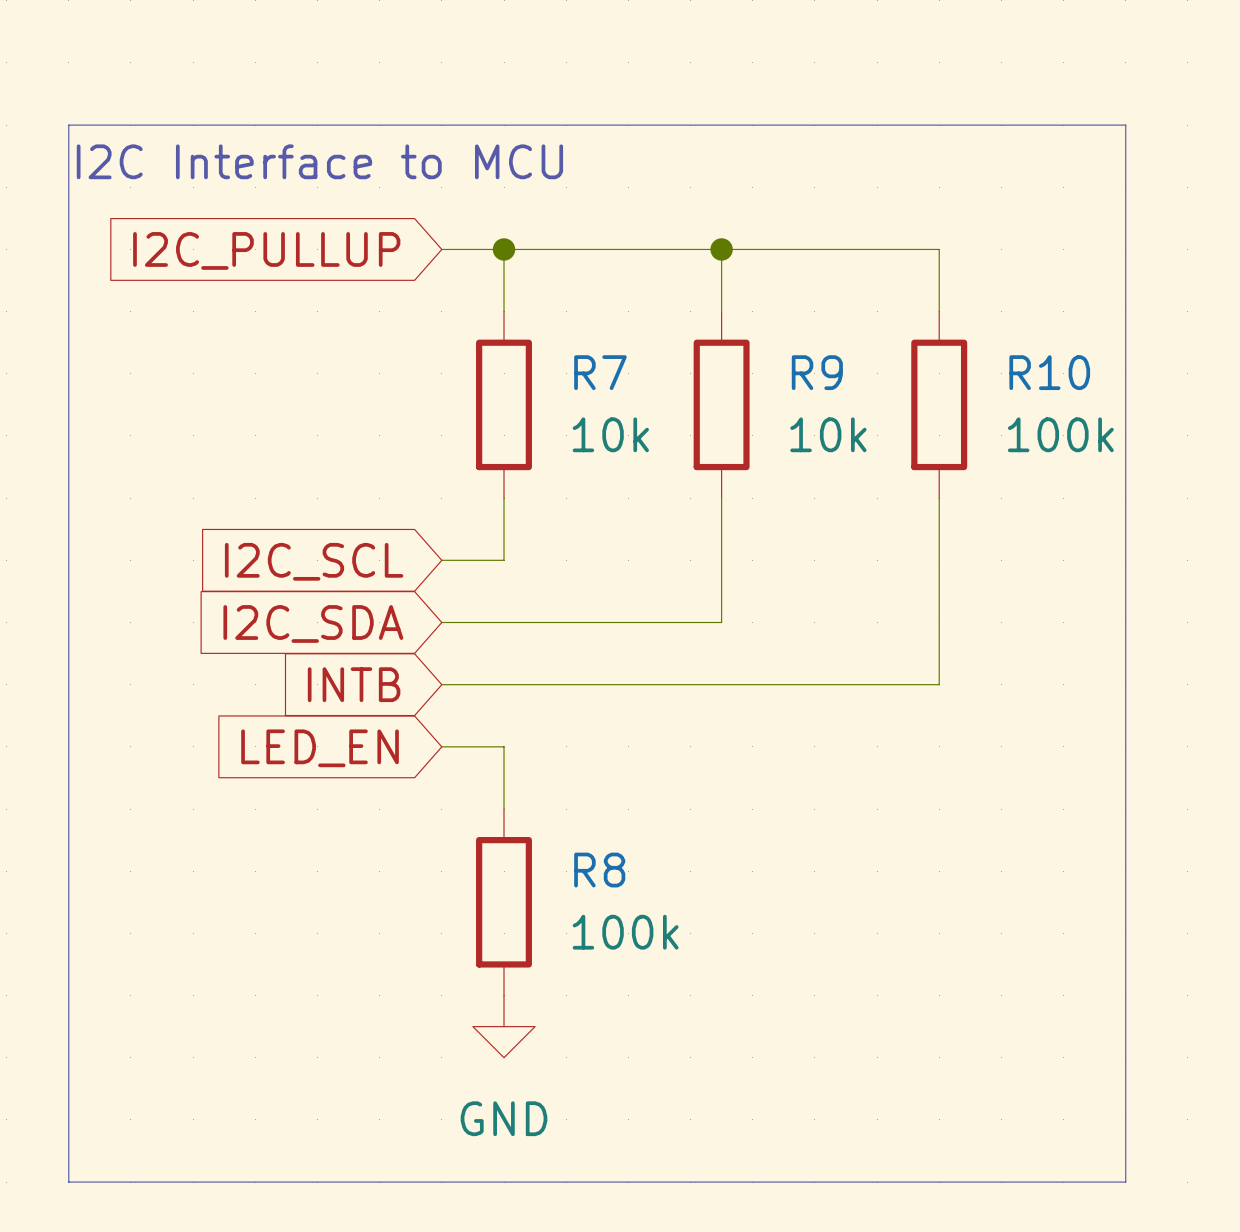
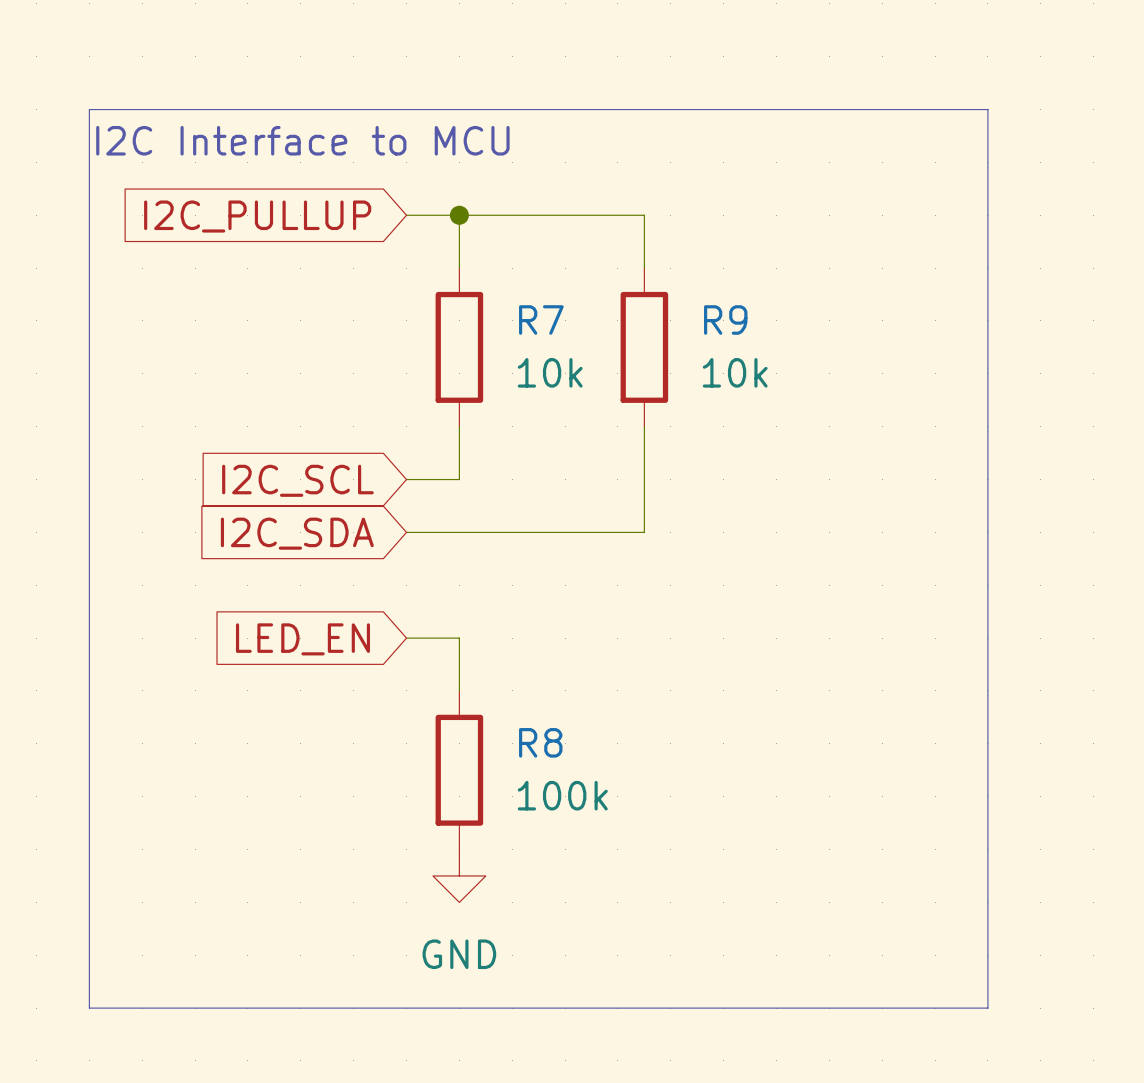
wire: (721, 249) (939, 249) (939, 311) -> none
junction: (721, 249) -> none
R10: 100k (939, 404) -> none
wire: (939, 498) (939, 684) (441, 684) -> none
global label: INTB (354, 684) -> none

